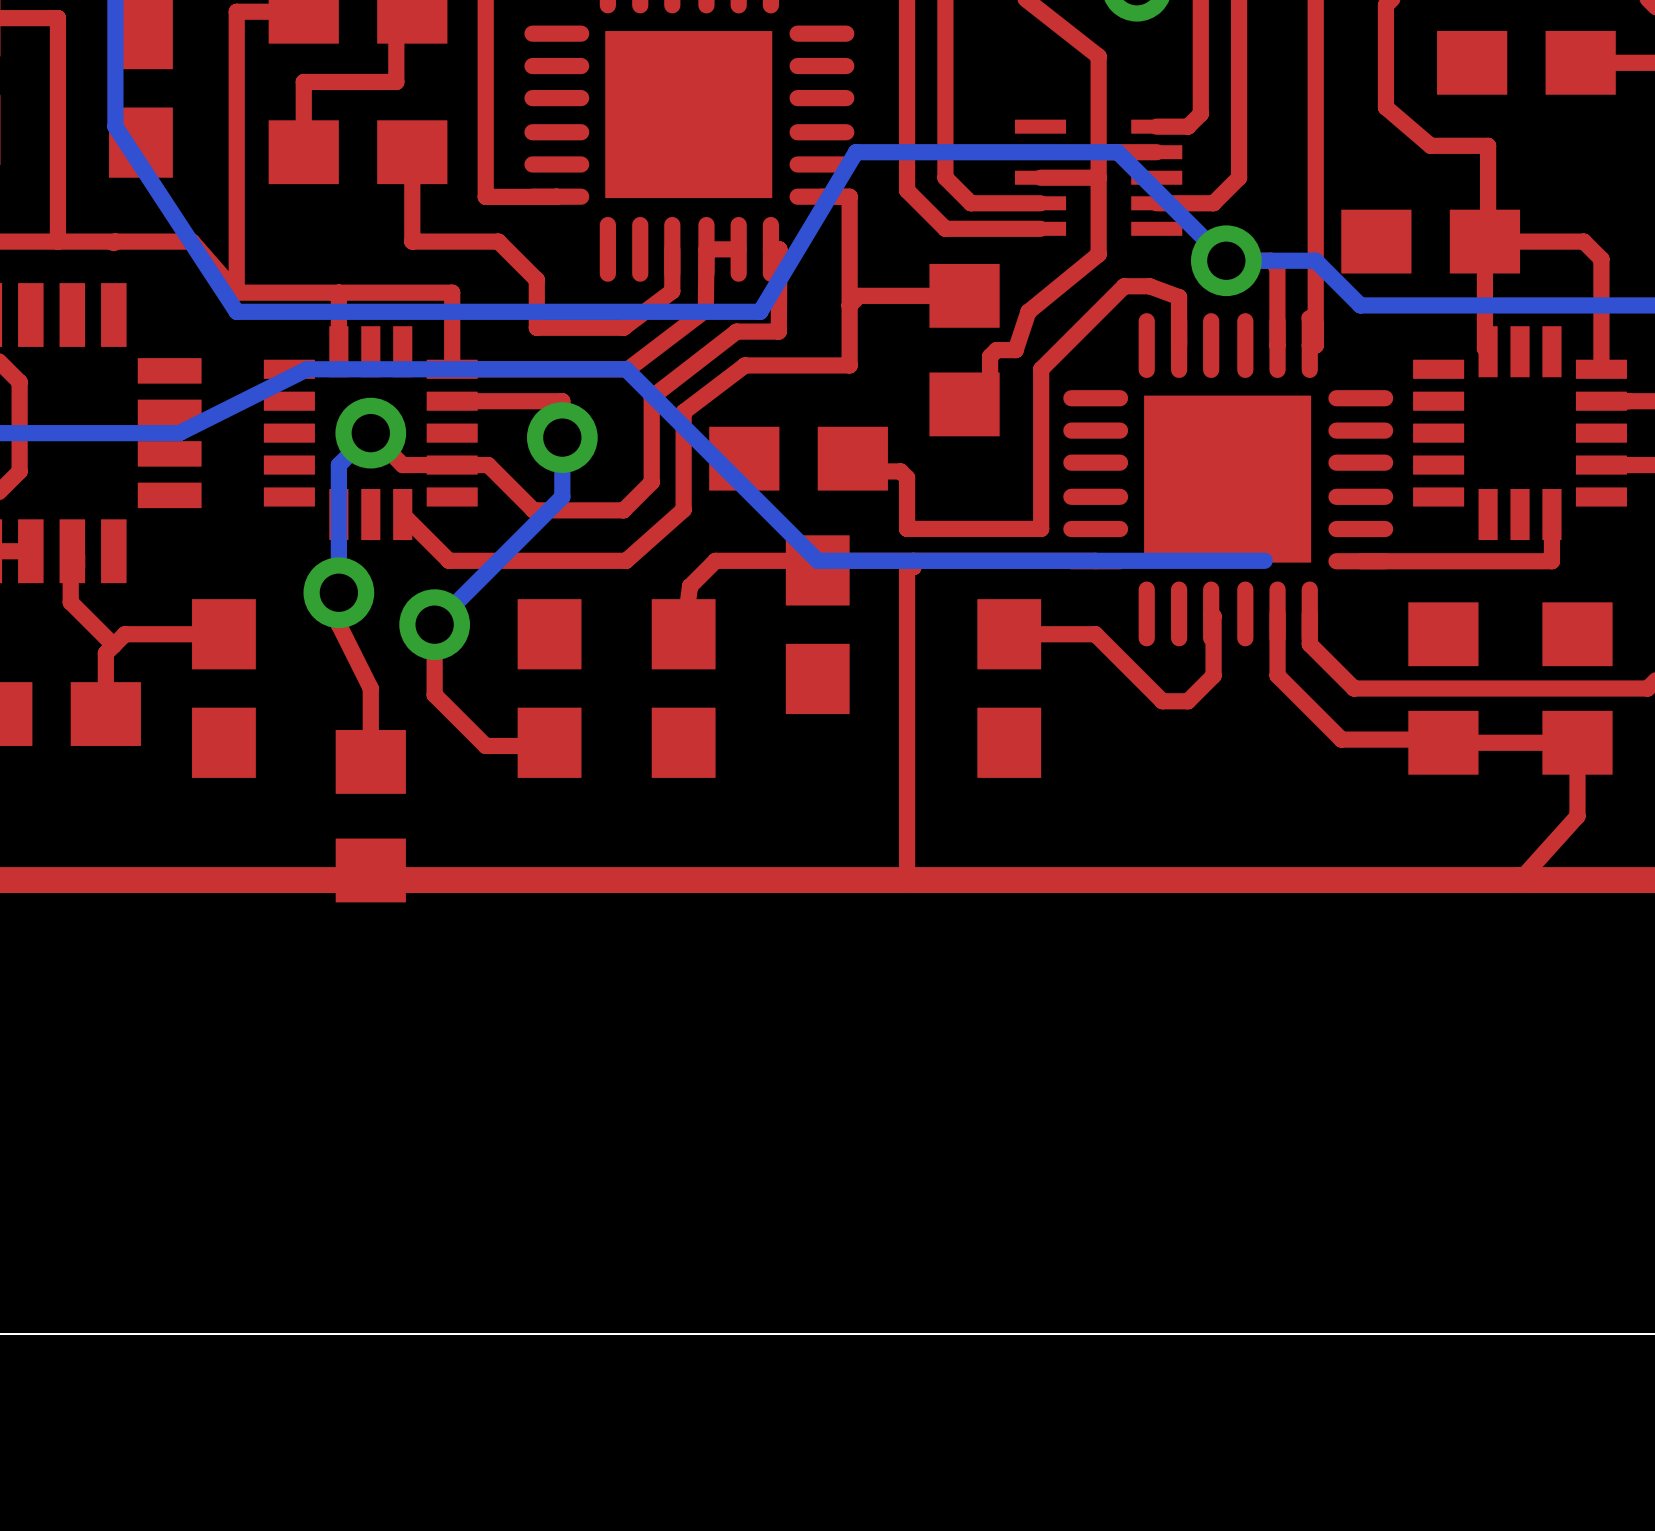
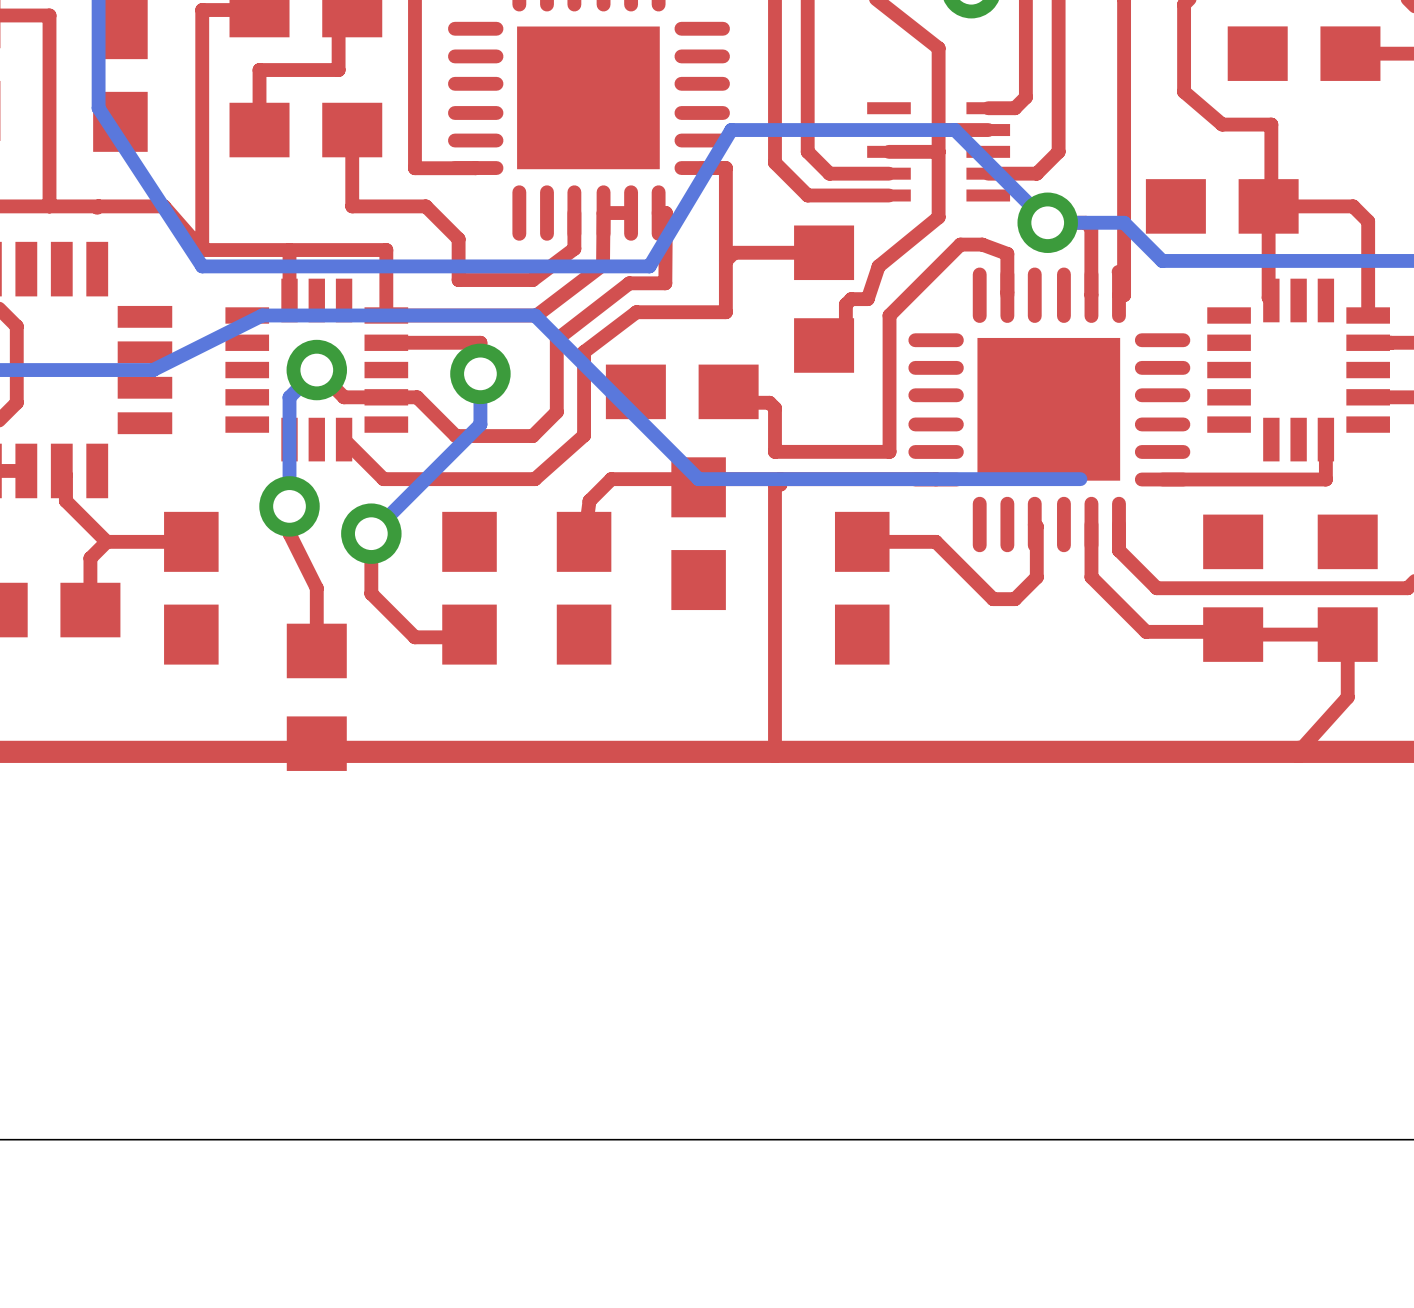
top track: (77, 567) (70, 573) (70, 602) (113, 645) -> (65, 484) (65, 500) (106, 541)

